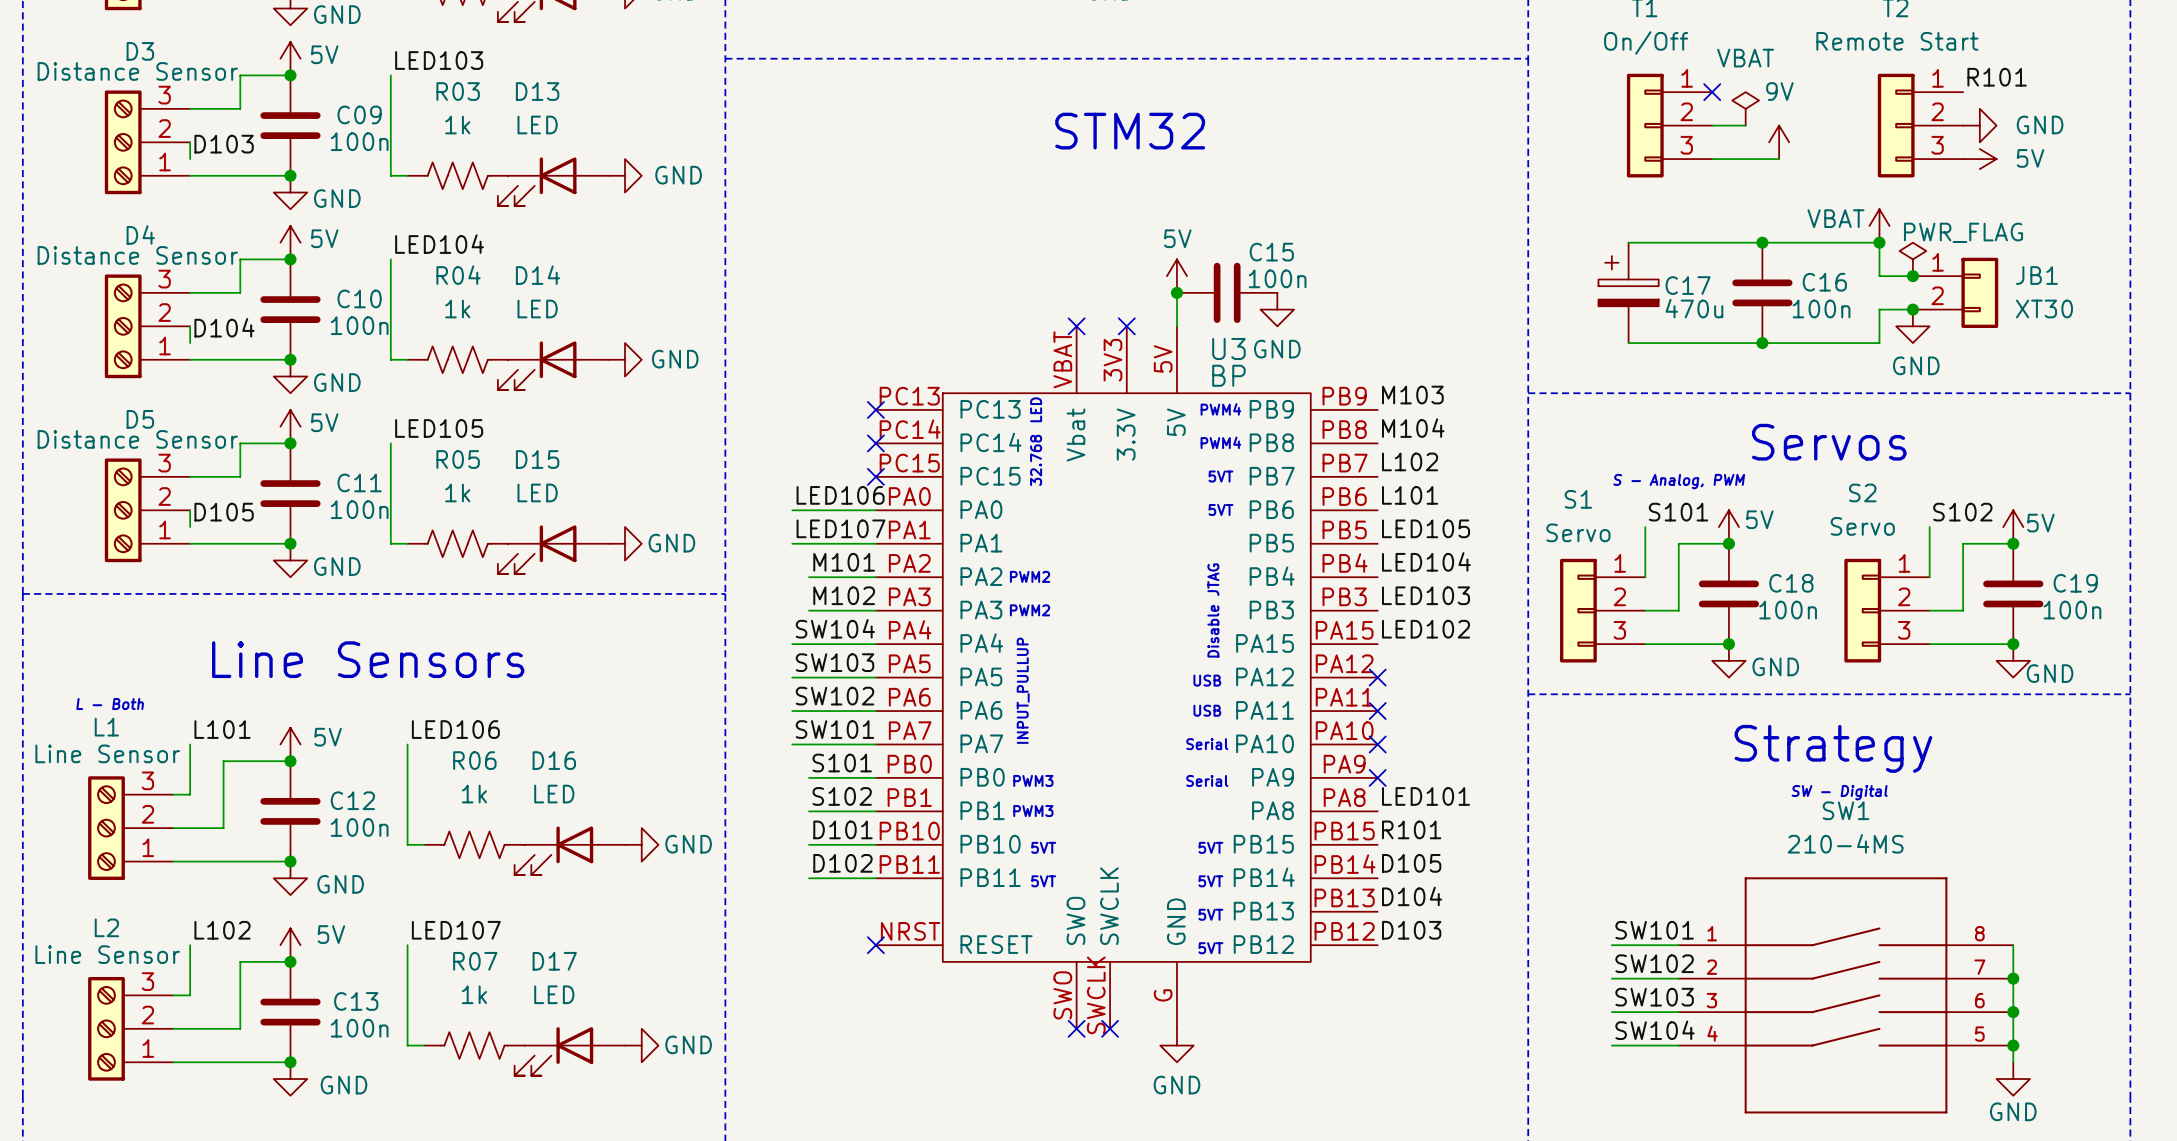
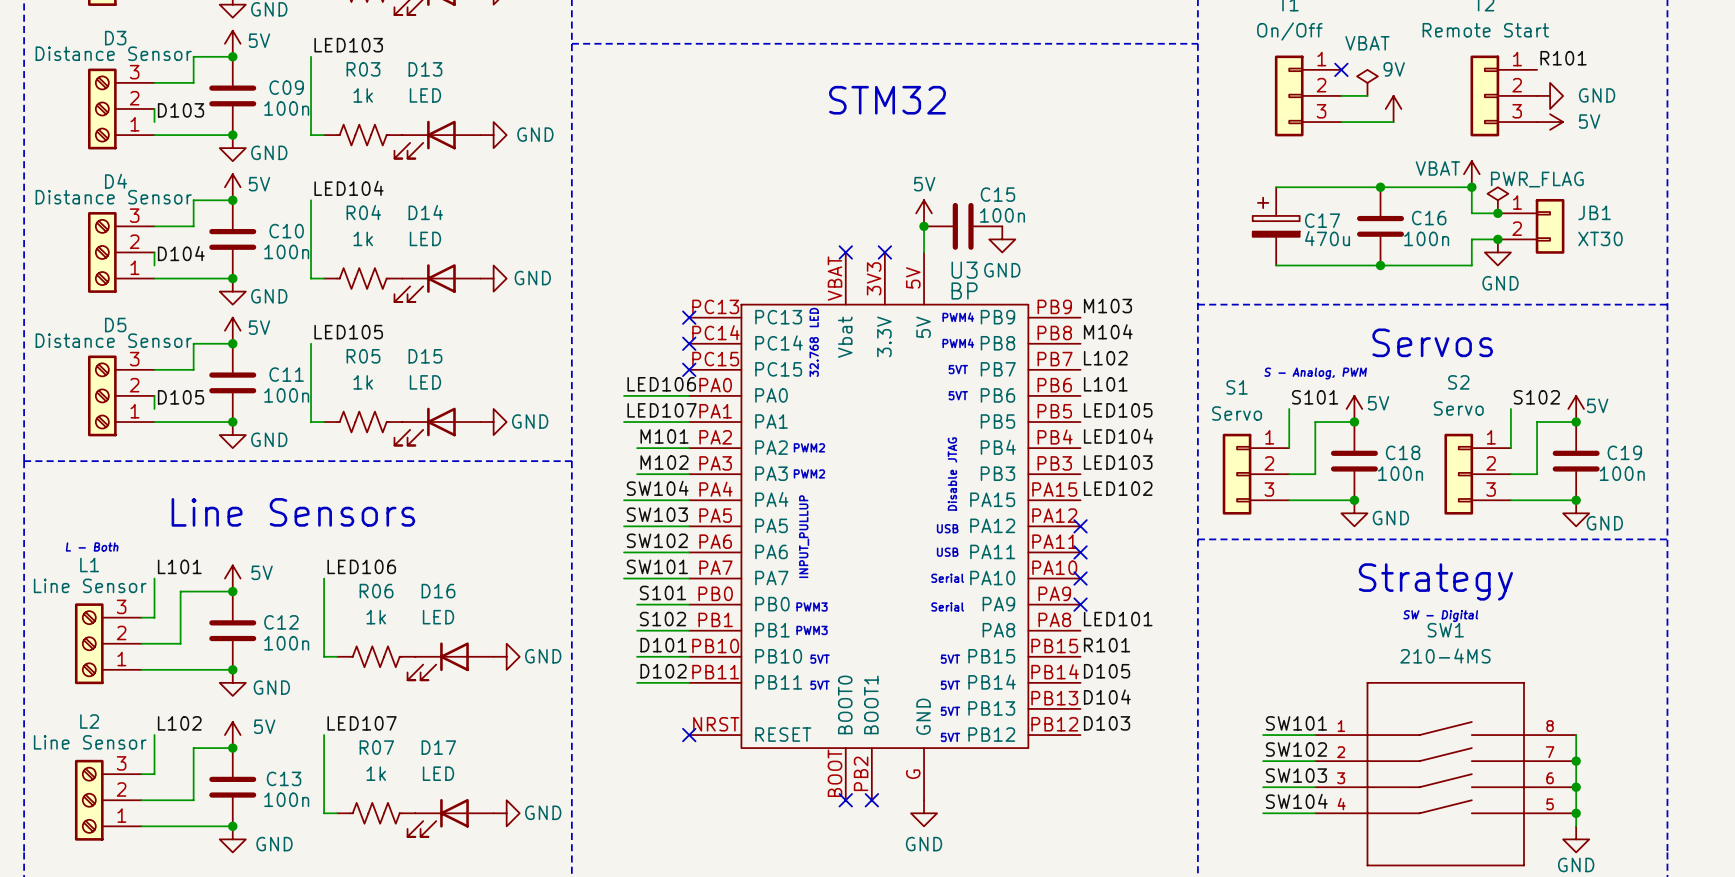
U3 pin name: SWCLK (1109, 906) -> BOOT1 (871, 704)
U3 pin name: SWO (1075, 920) -> BOOT0 (845, 704)
U3 pin number: SWO (1062, 995) -> BOOT (835, 773)
U3 pin number: SWCLK (1096, 995) -> PB2 (861, 773)

